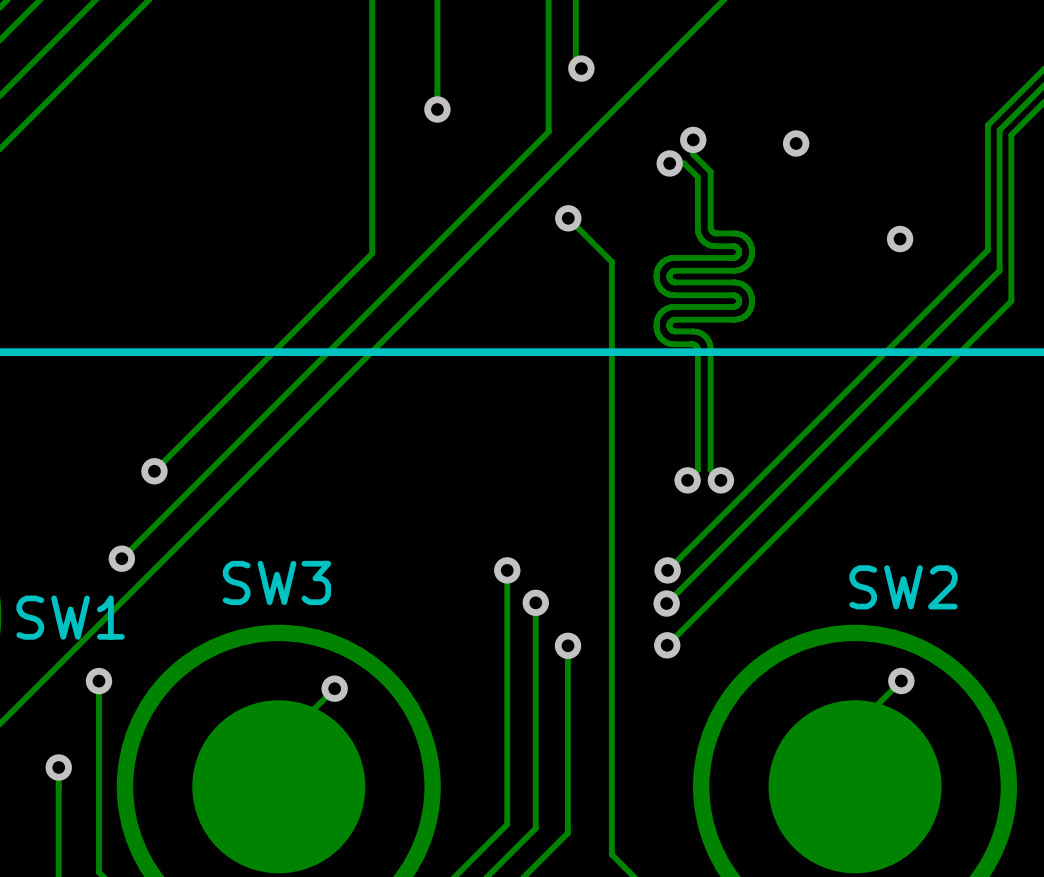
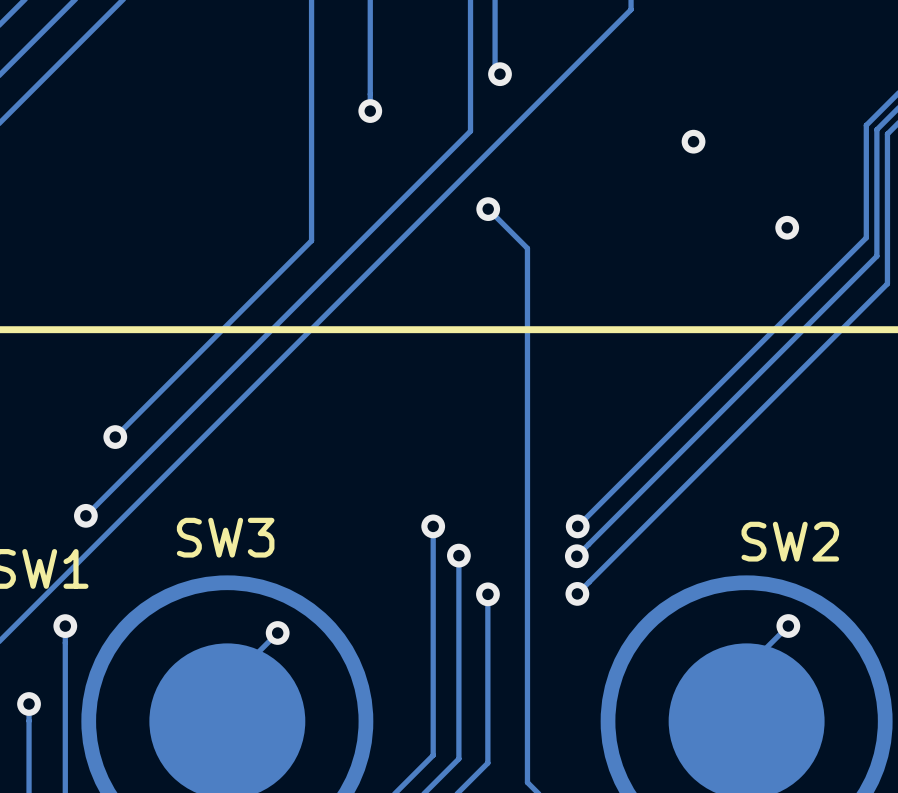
track: (693, 139) (693, 154) (710, 171) (711, 230) (715, 233) (742, 235) (750, 243) (751, 251) (748, 264) (738, 270) (675, 270) (669, 275) (670, 280) (675, 282) (738, 282) (748, 289) (751, 296) (750, 309) (745, 315) (738, 319) (675, 319) (669, 324) (670, 329) (673, 331) (700, 333) (706, 338) (710, 345) (710, 470) (720, 480) -> none
via: (693, 139) -> none
track: (669, 163) (684, 163) (697, 177) (697, 228) (701, 239) (711, 245) (734, 246) (739, 252) (737, 255) (733, 257) (670, 258) (663, 261) (656, 271) (658, 285) (663, 291) (670, 294) (733, 295) (739, 299) (737, 304) (733, 306) (670, 307) (660, 313) (656, 320) (656, 330) (663, 340) (670, 343) (693, 344) (697, 348) (697, 470) (687, 480) -> none
via: (669, 163) -> none
via: (687, 480) -> none
via: (720, 480) -> none

